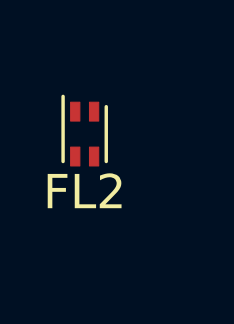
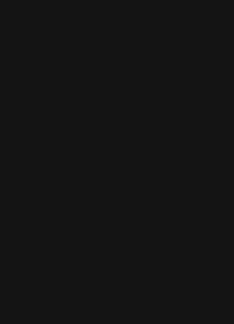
FL2: (84, 130) -> none

